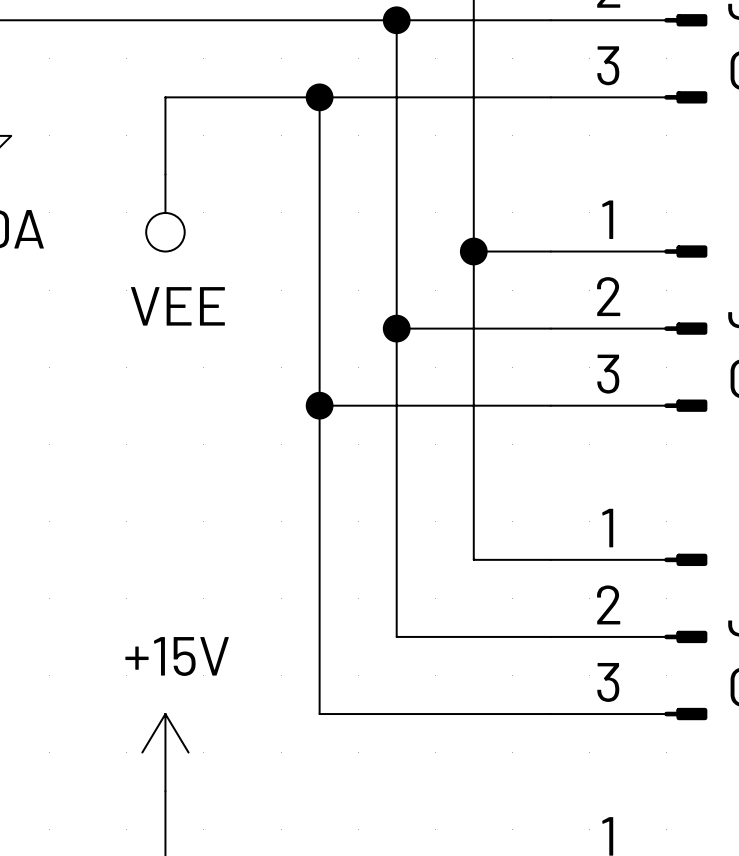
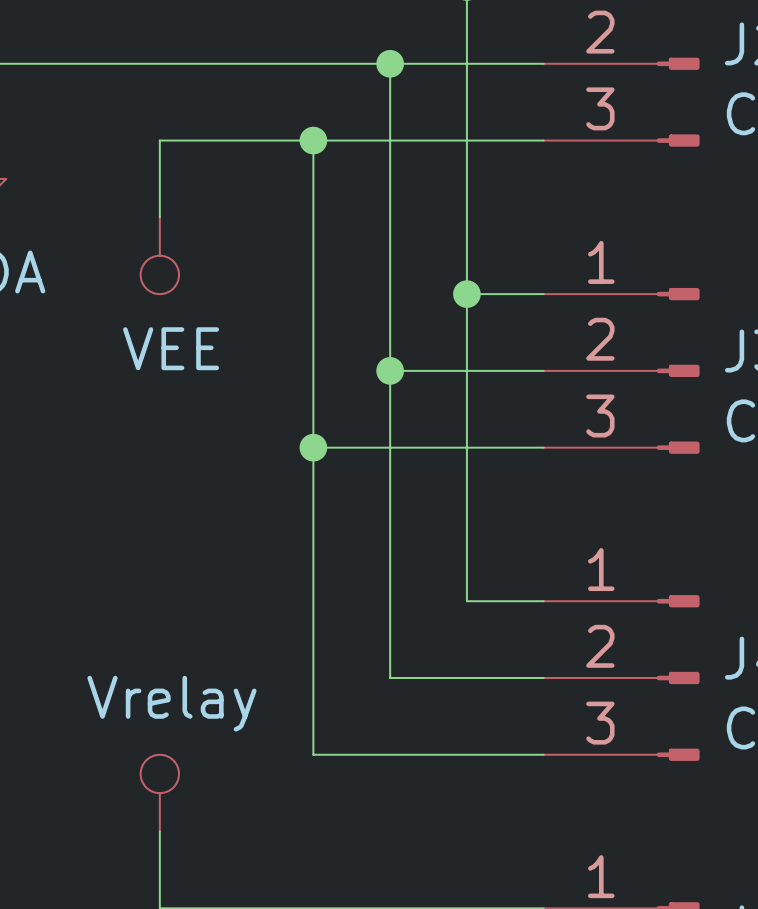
power symbol: +15V (165, 752) -> Vrelay (159, 793)

